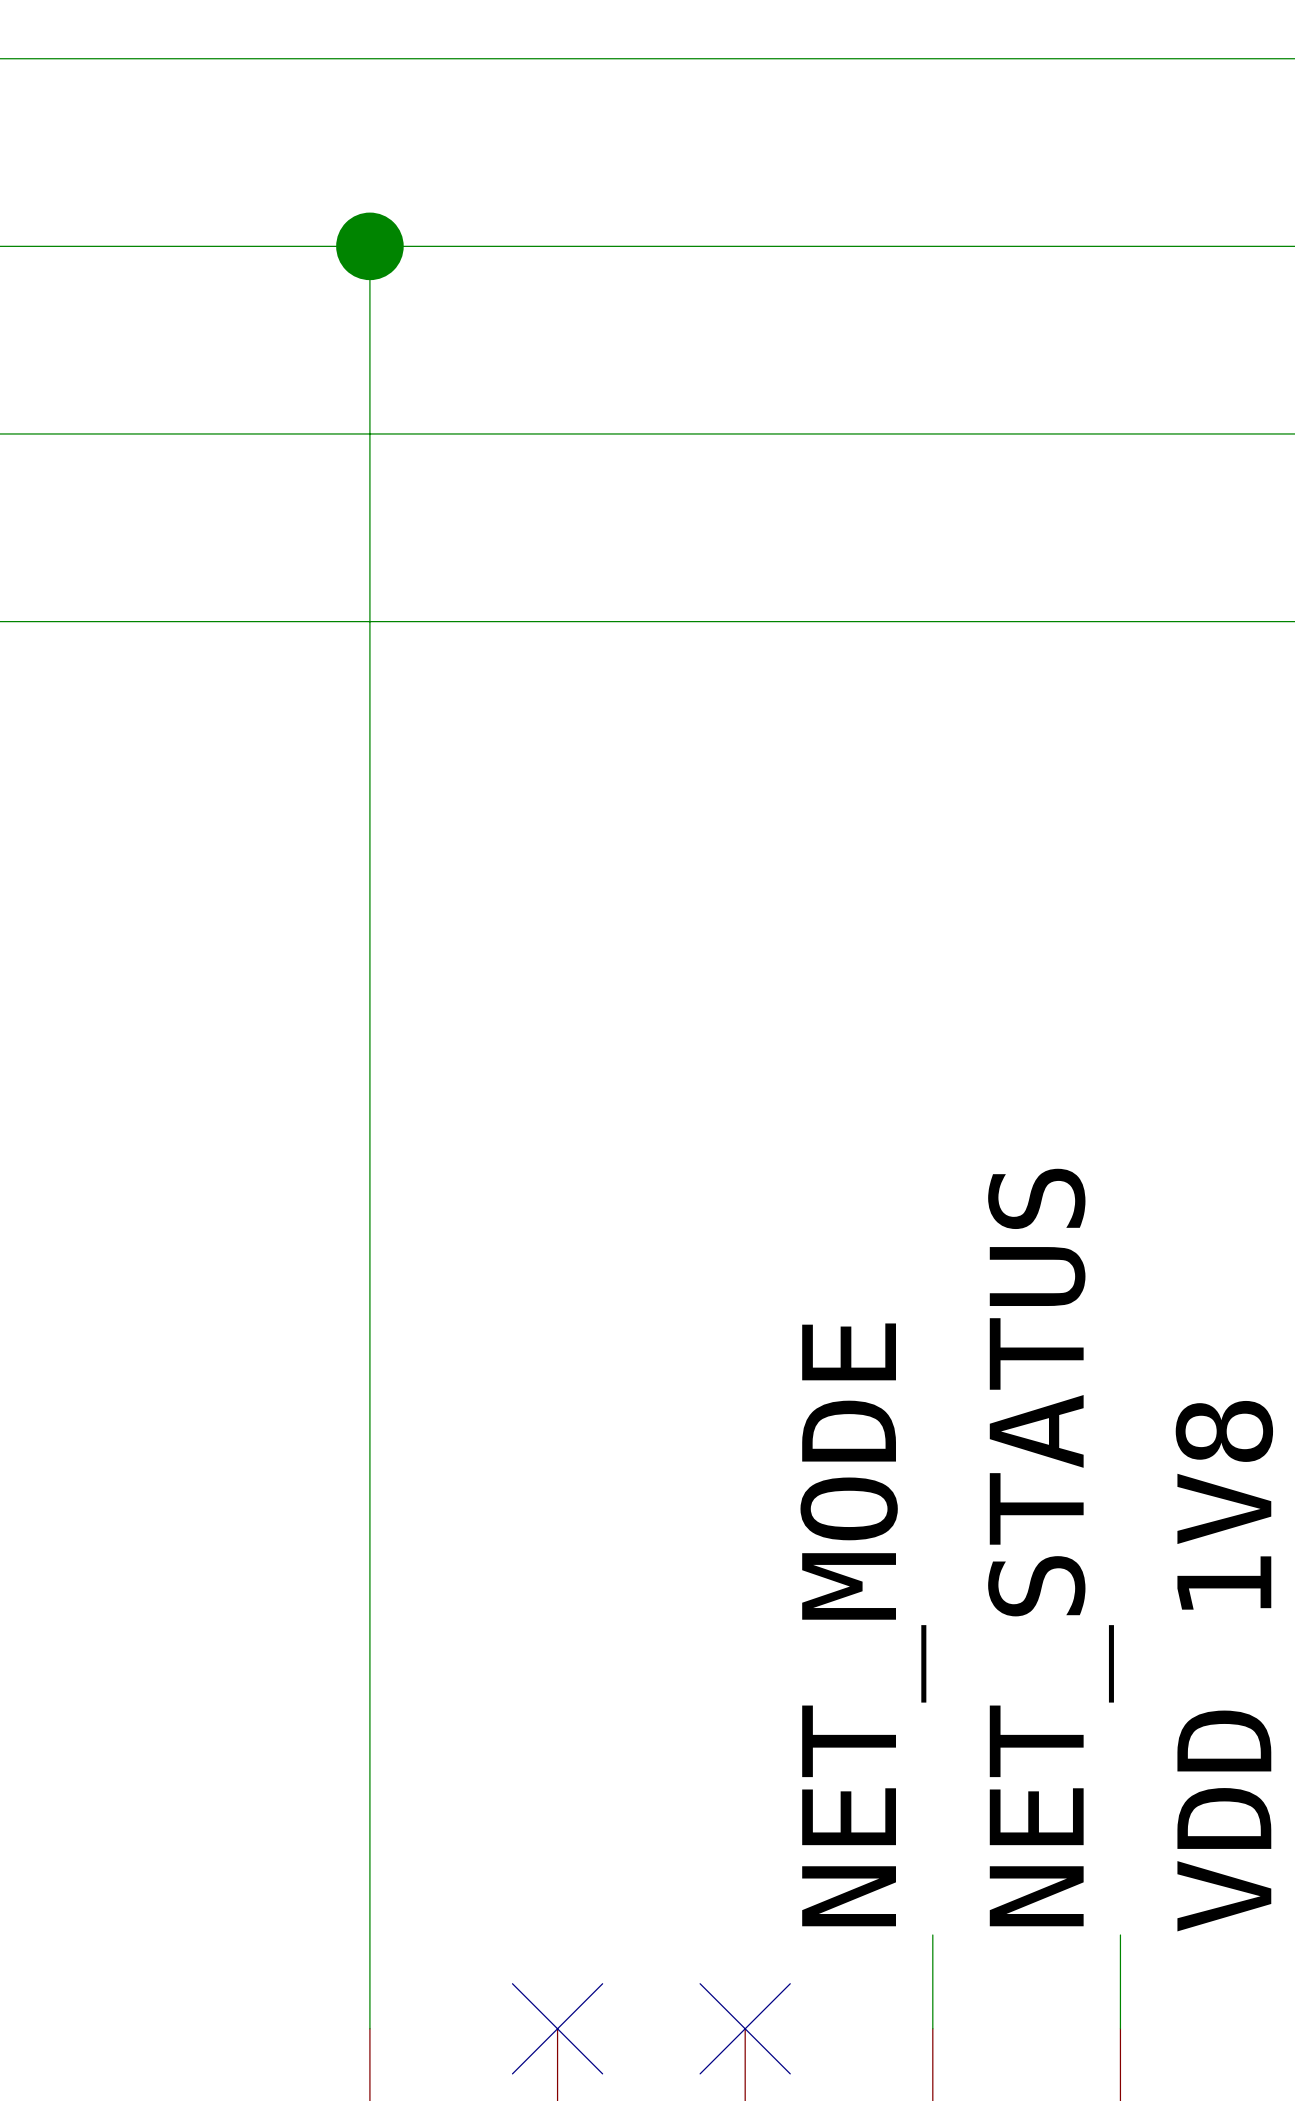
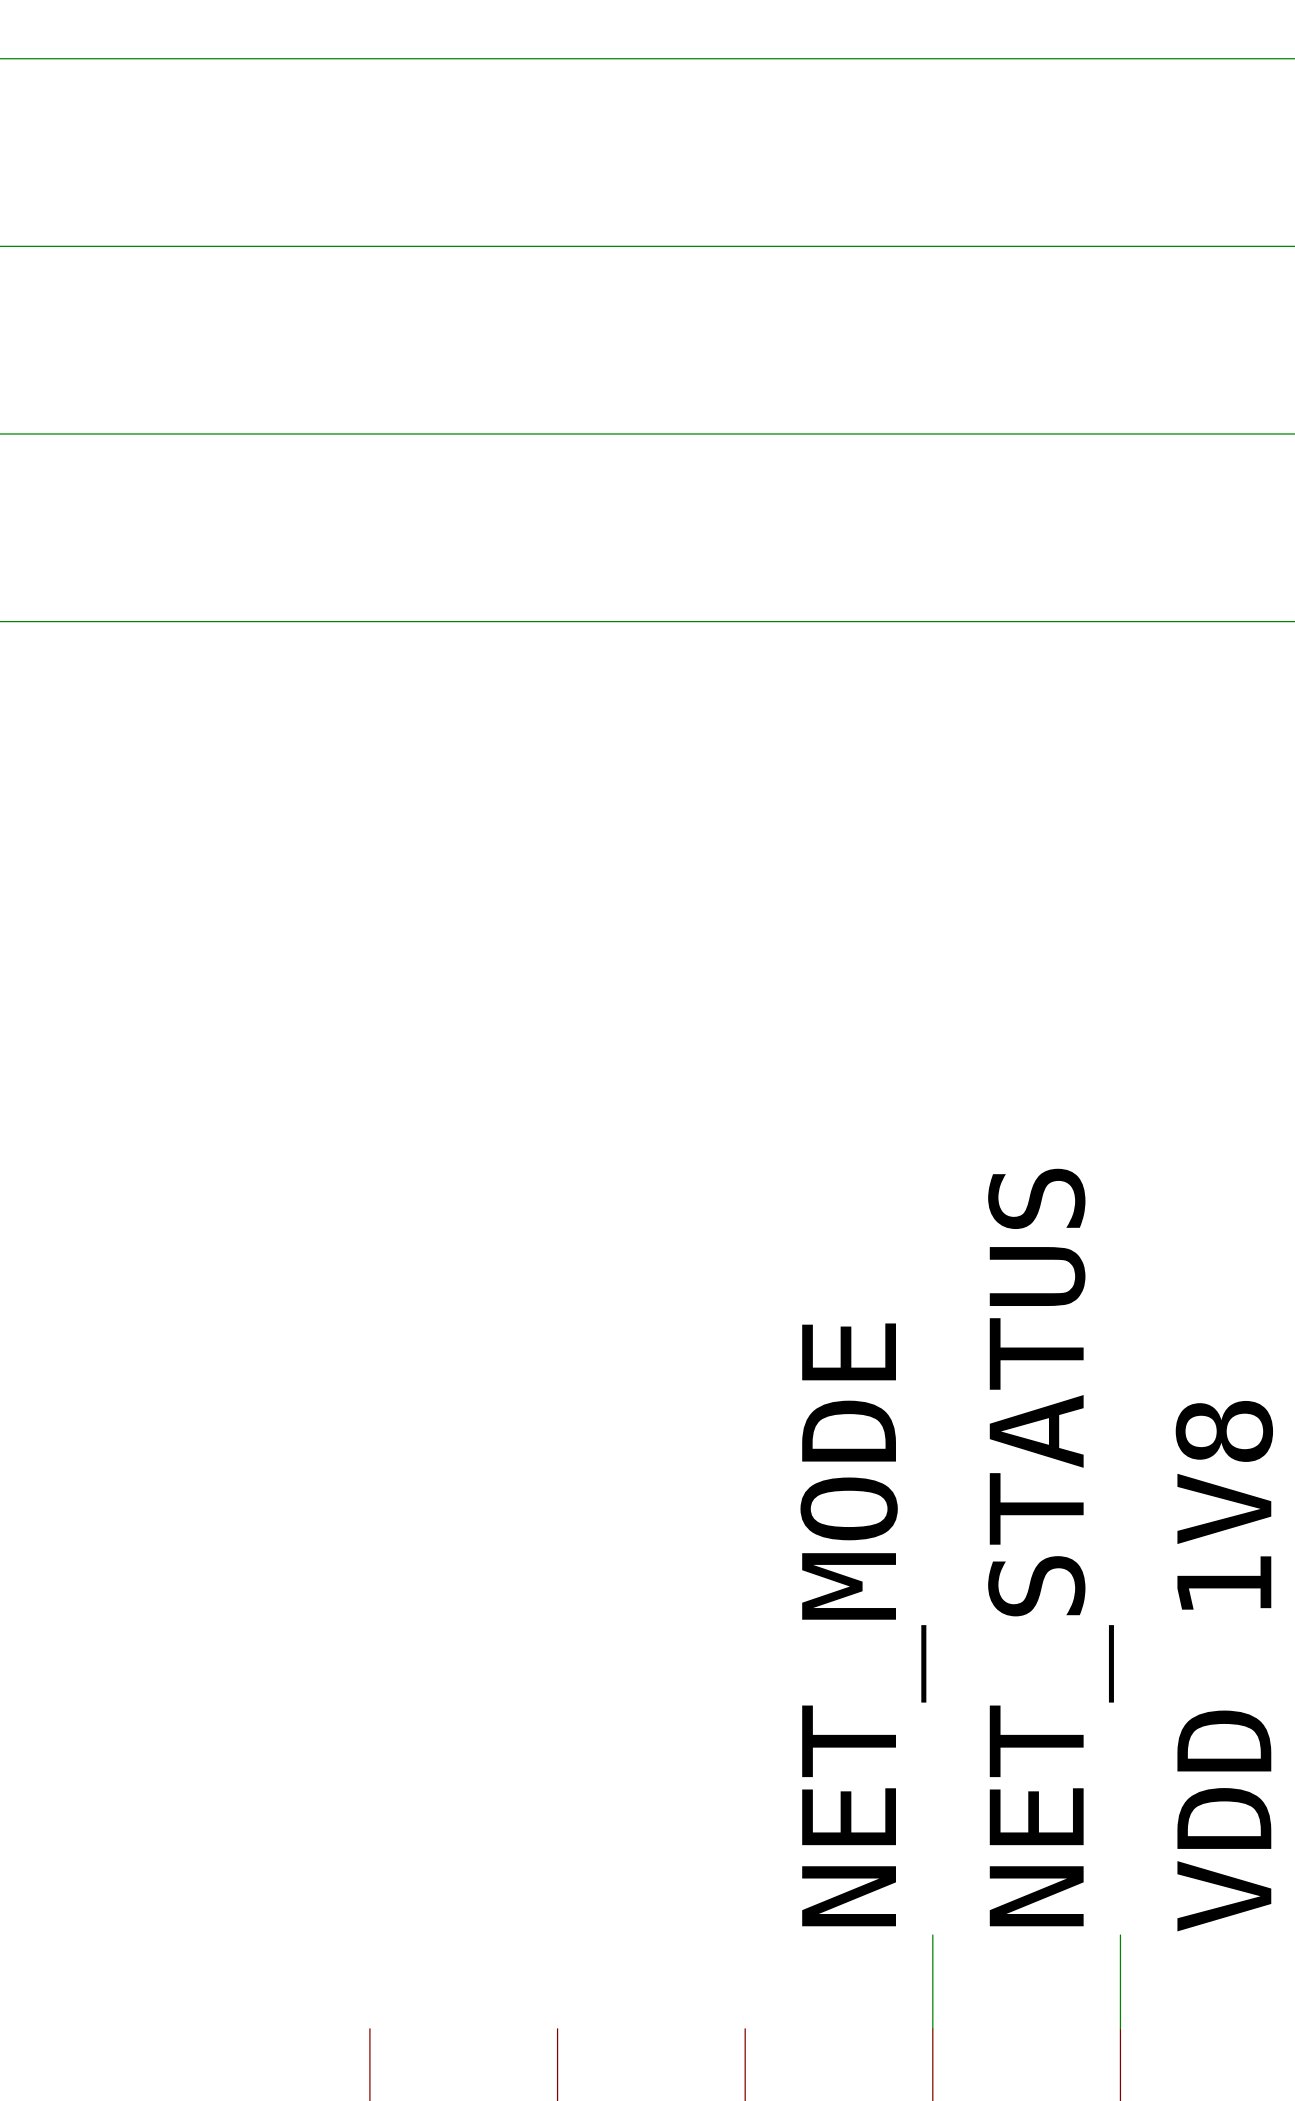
wire: (369, 246) (369, 2028) -> none
junction: (369, 246) -> none
no-connect mark: (557, 2028) -> none
no-connect mark: (745, 2028) -> none

